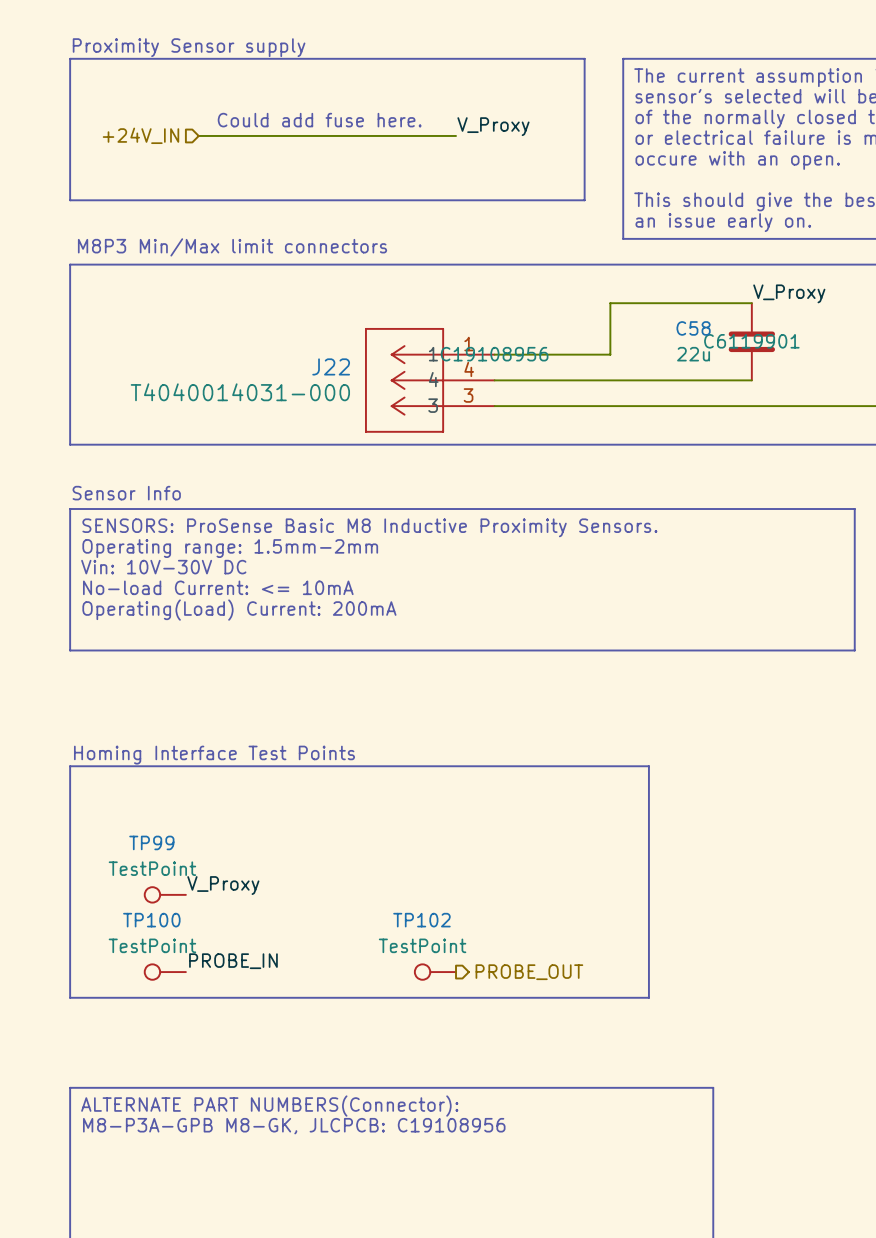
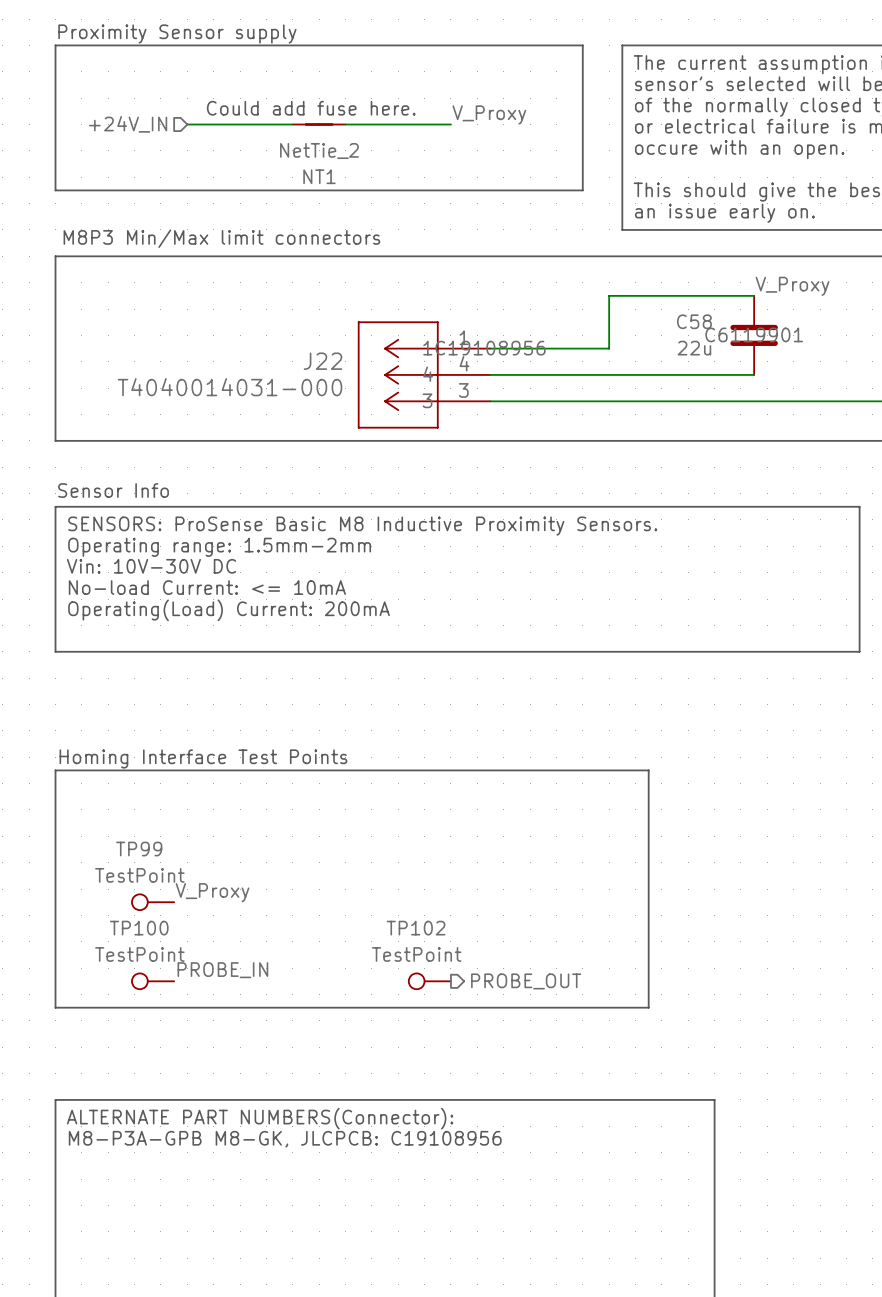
NT1: none -> NetTie_2 (319, 124)

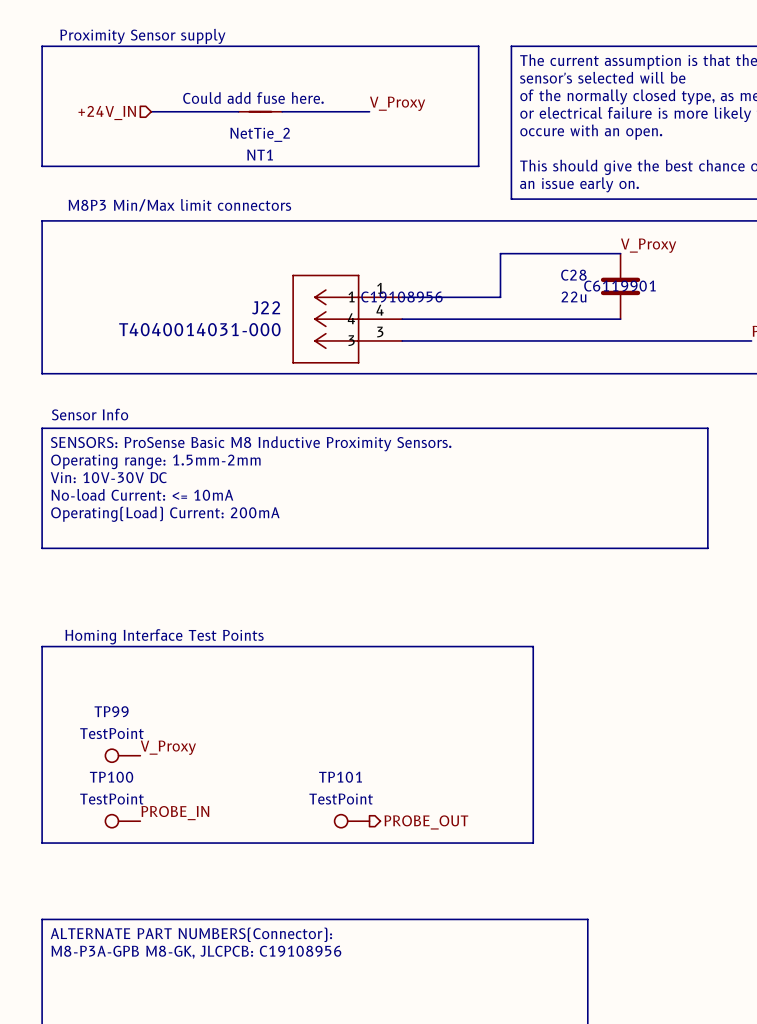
C58 name: C58 (694, 321) -> C28 (573, 275)
TP102 name: TP102 (416, 928) -> TP101 (340, 777)

